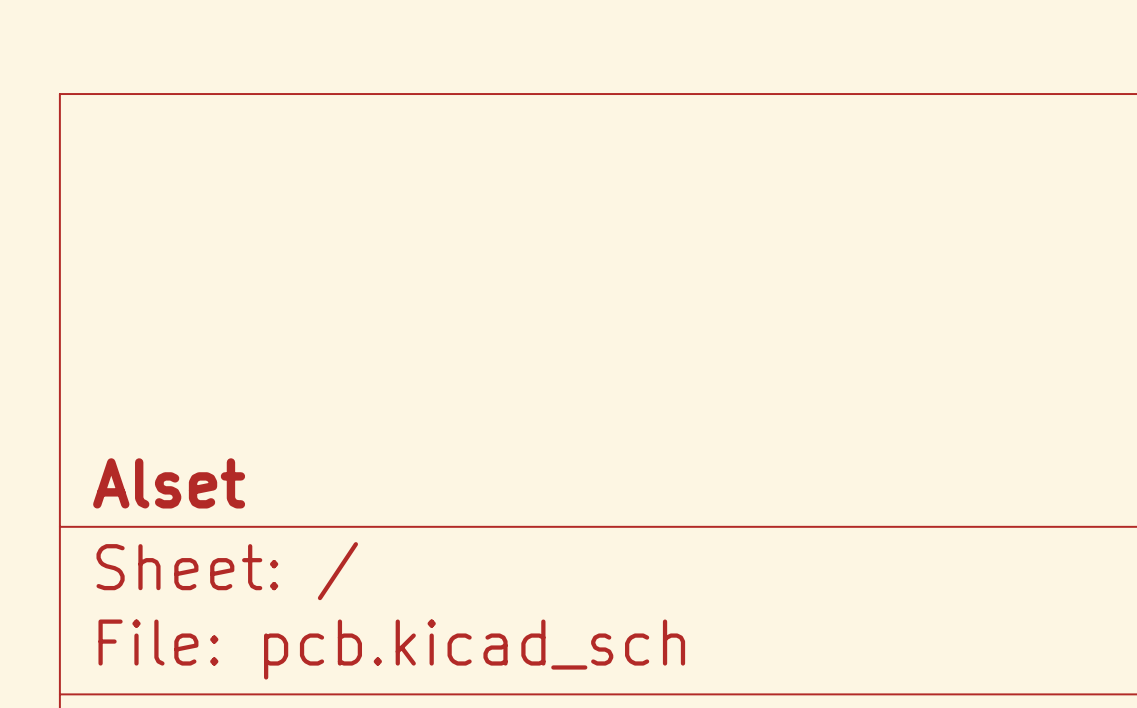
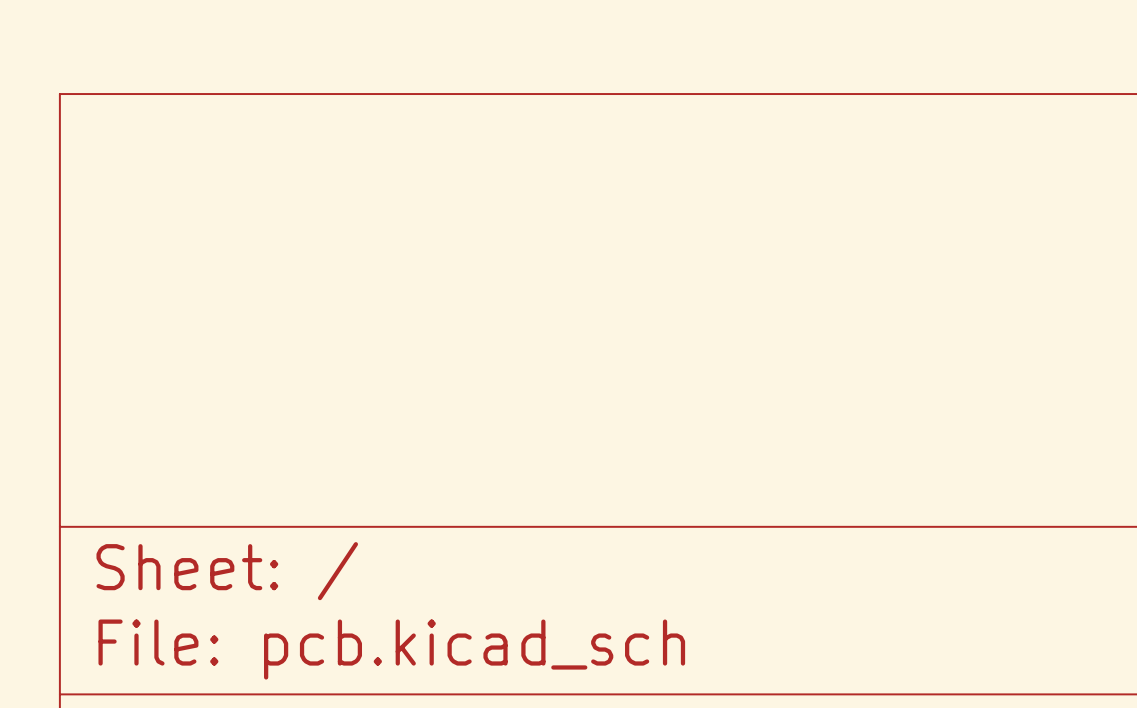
title block: Alset (169, 483) -> none

